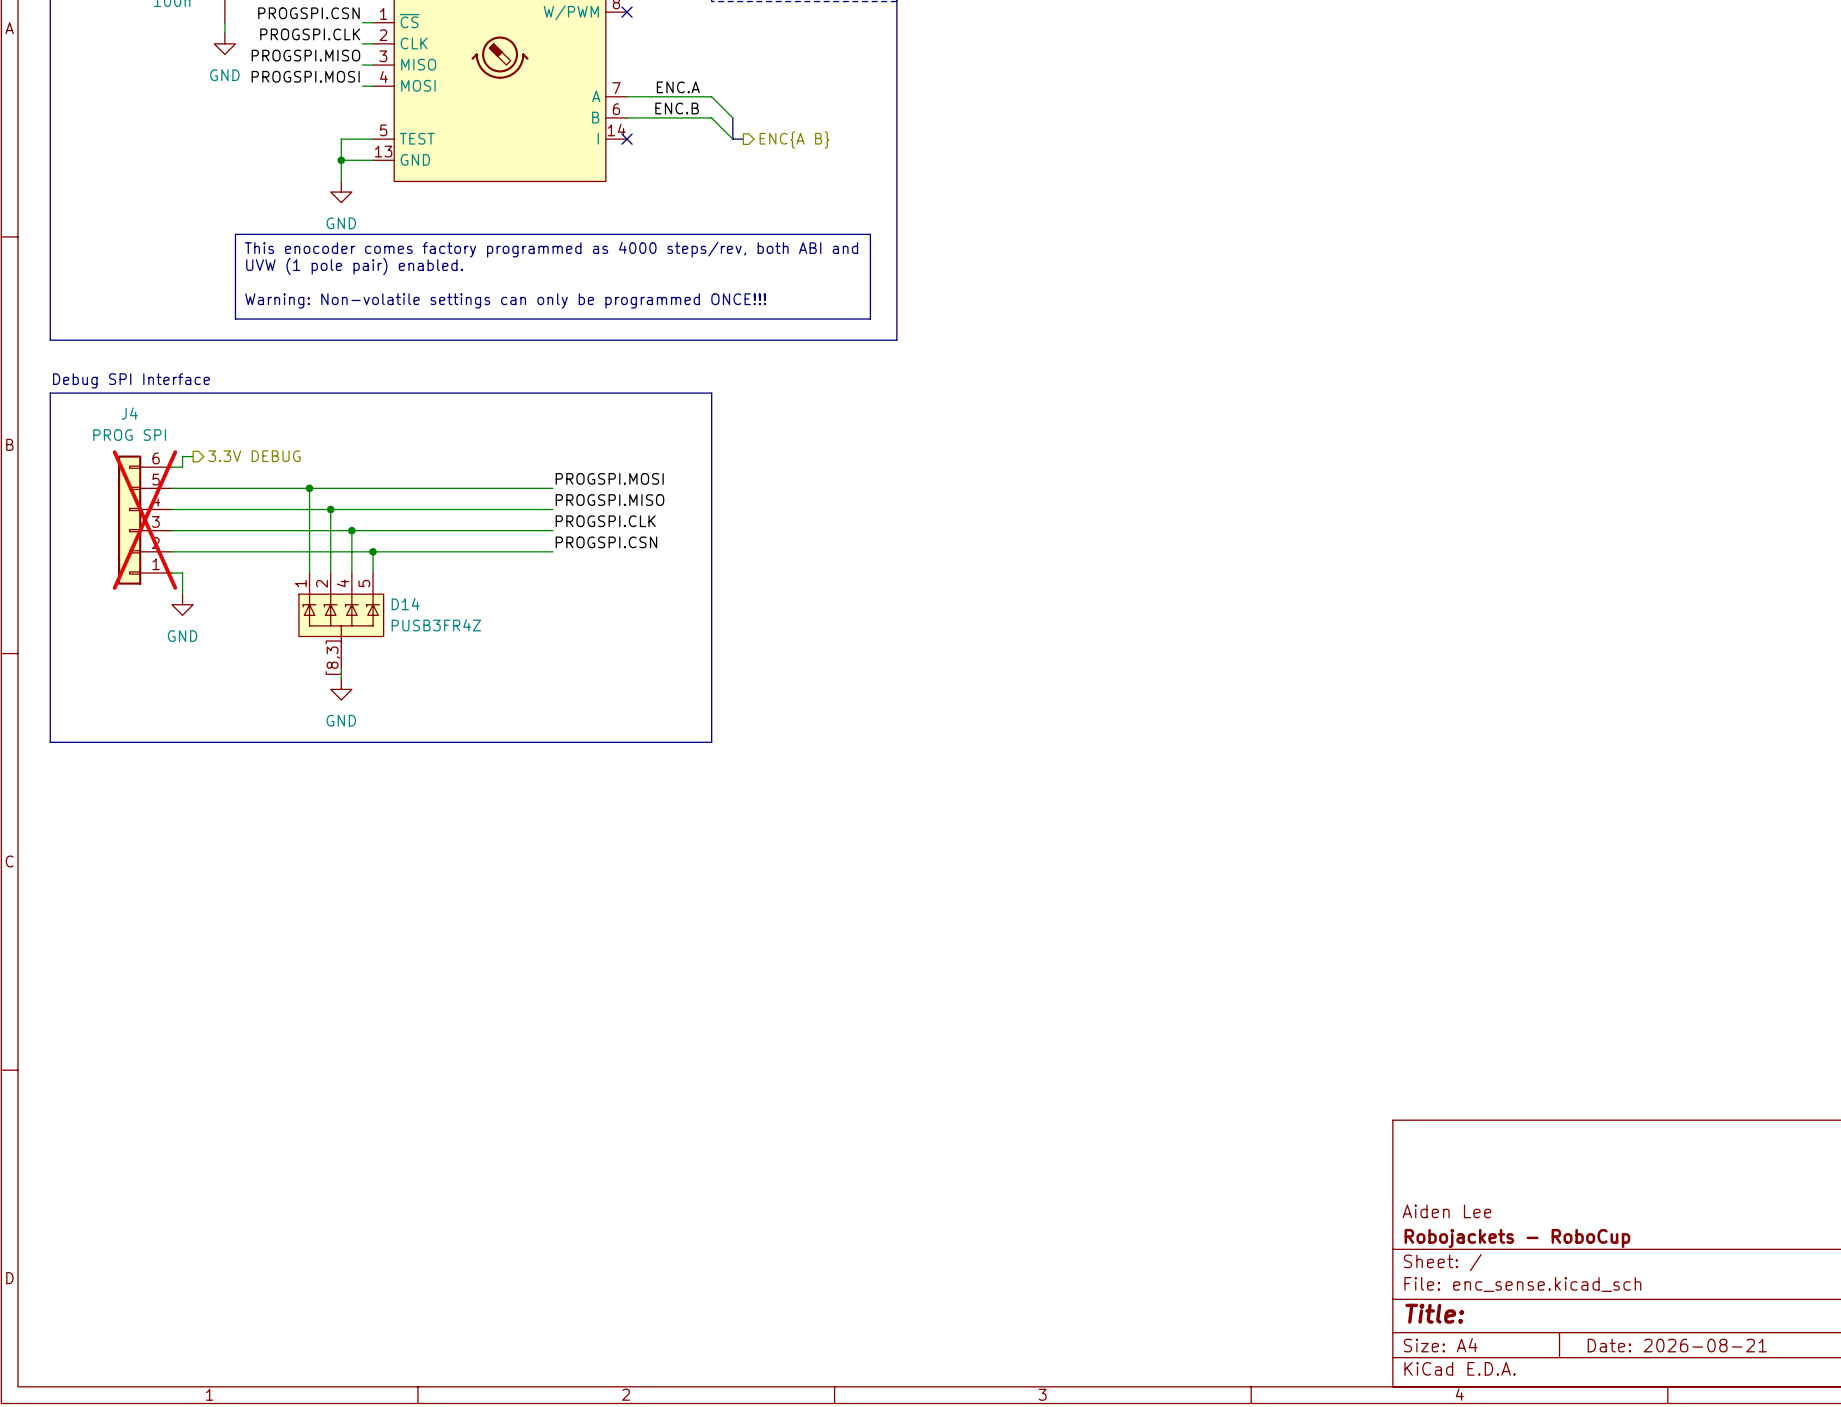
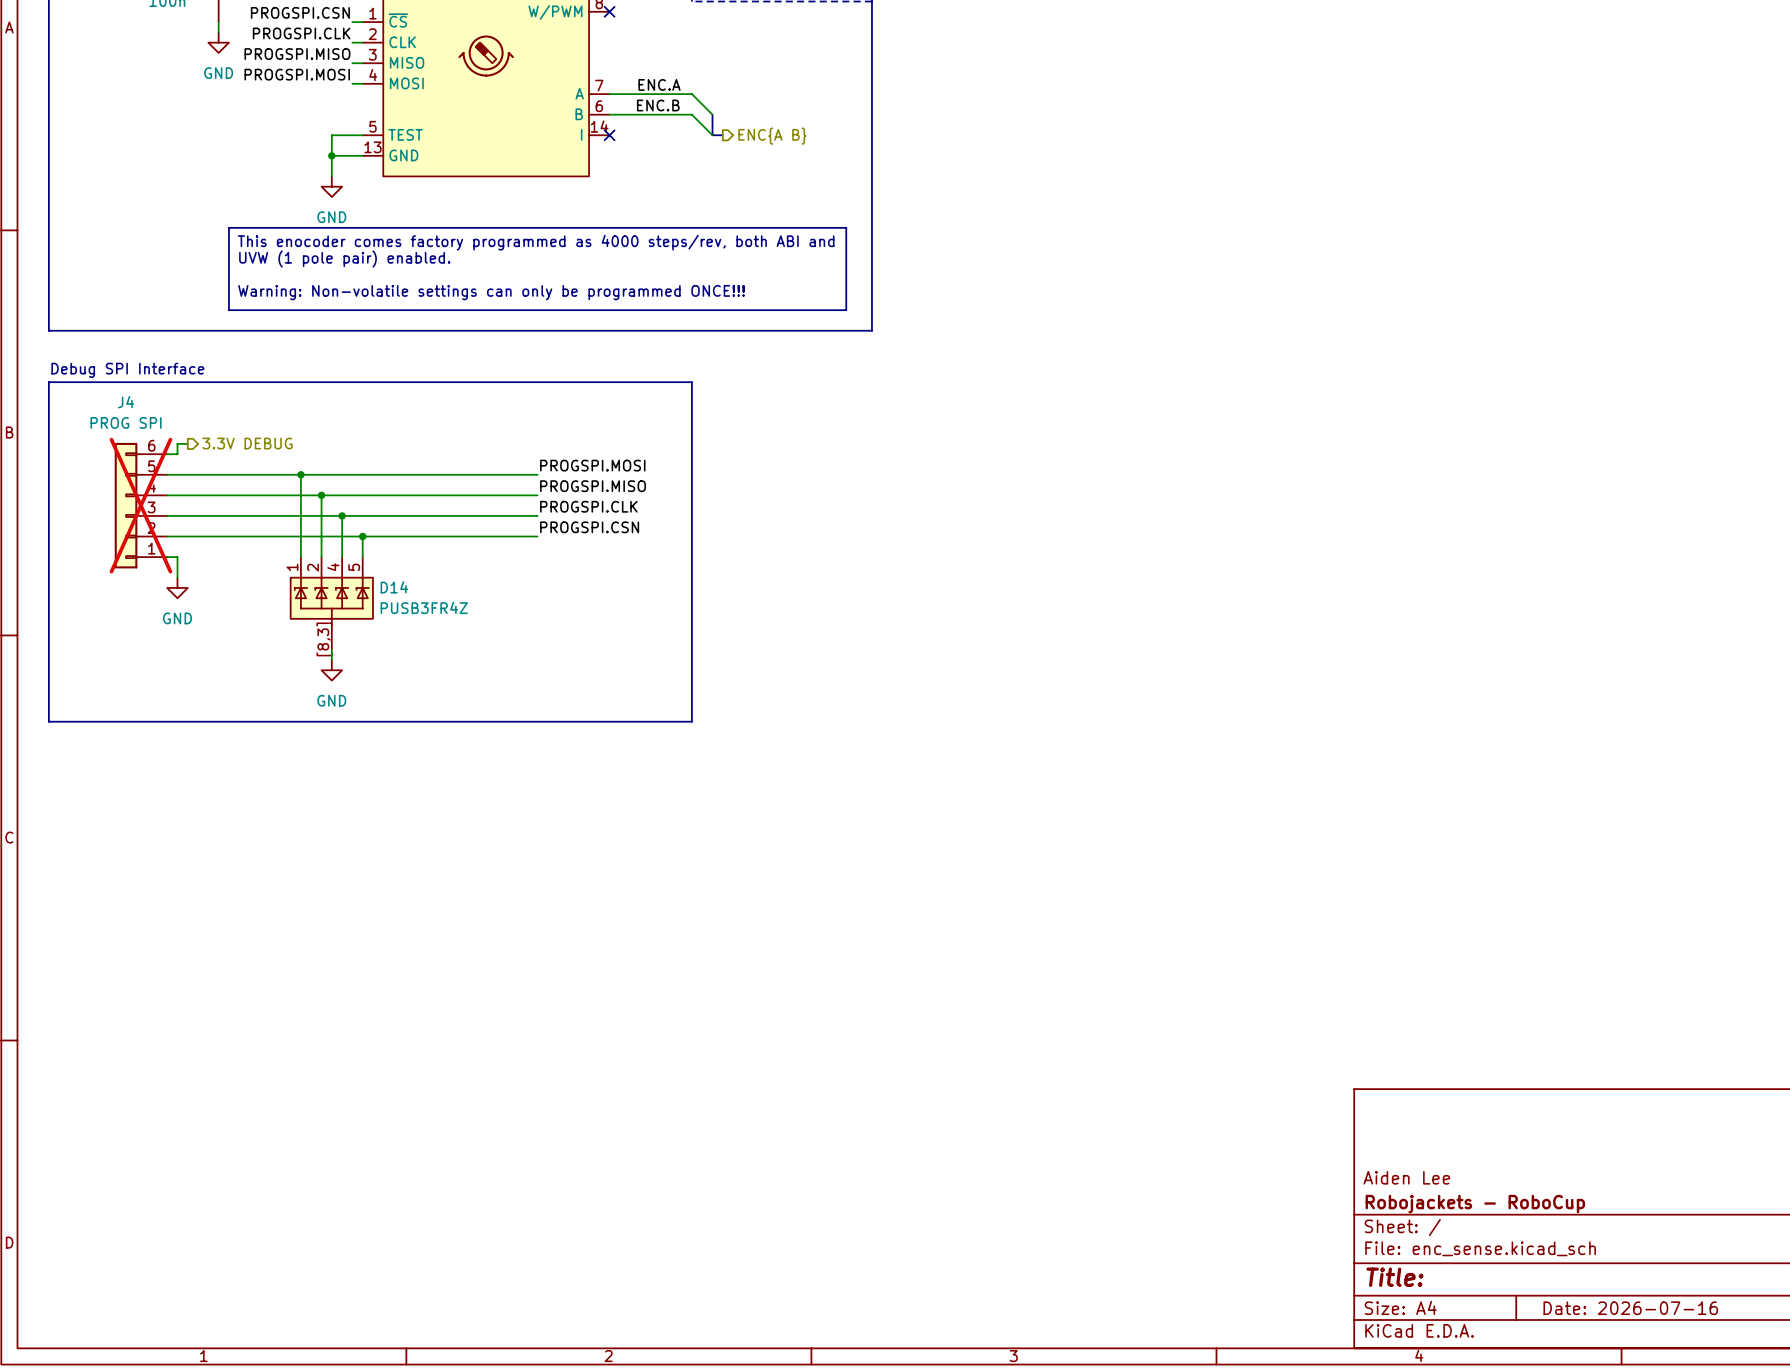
title block: Date: 2026-08-21 (1677, 1345) -> Date: 2026-07-16 (1630, 1308)

